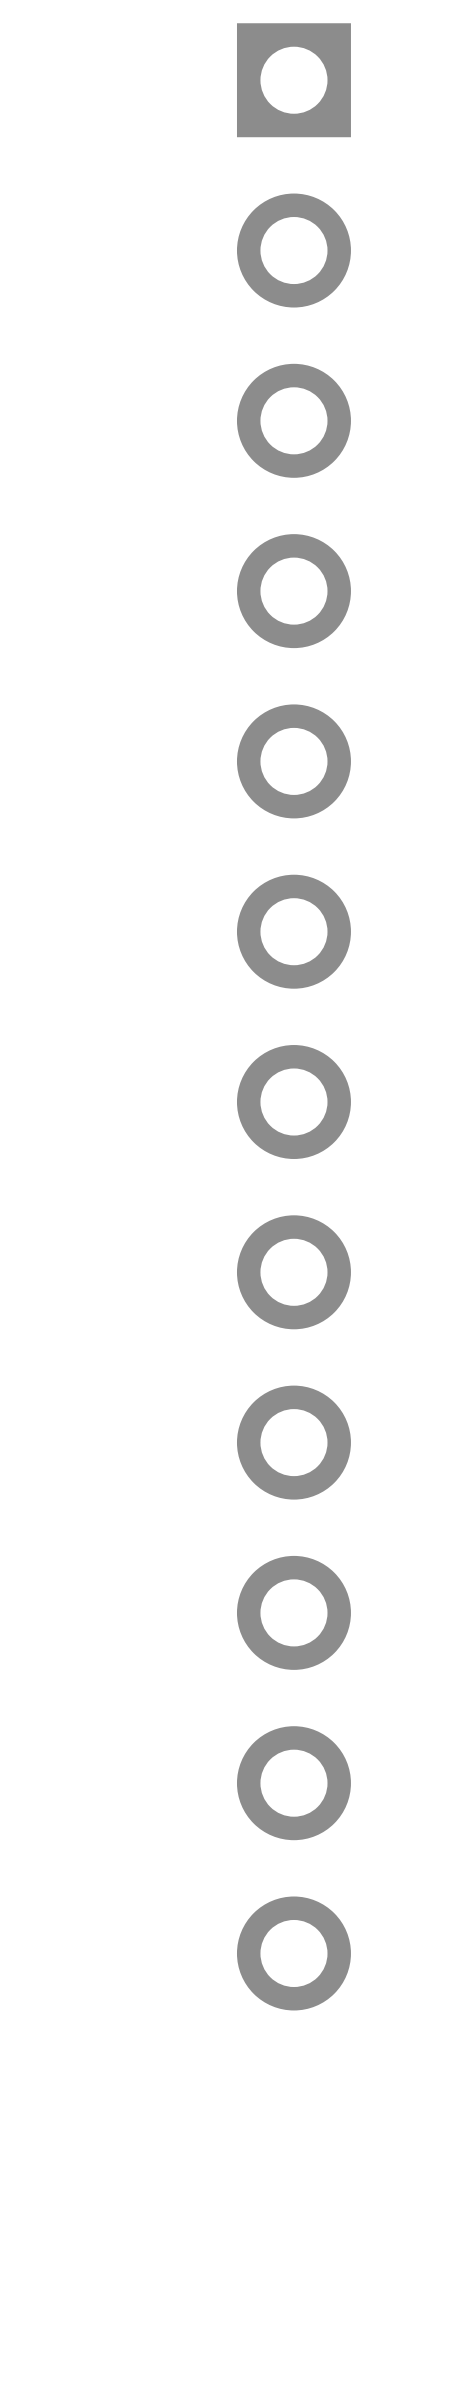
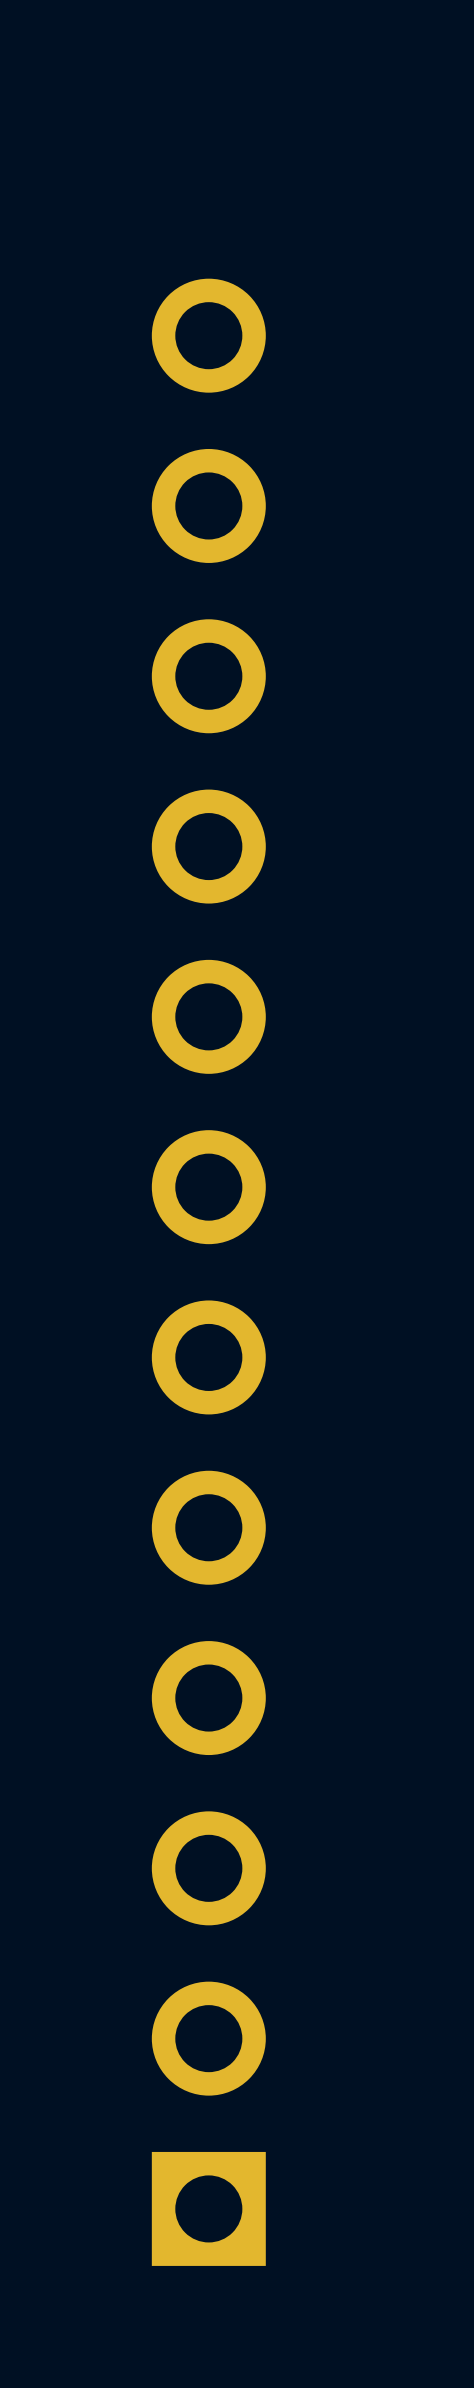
part rotation: 0° (293, 1016) -> 180° (208, 1272)

